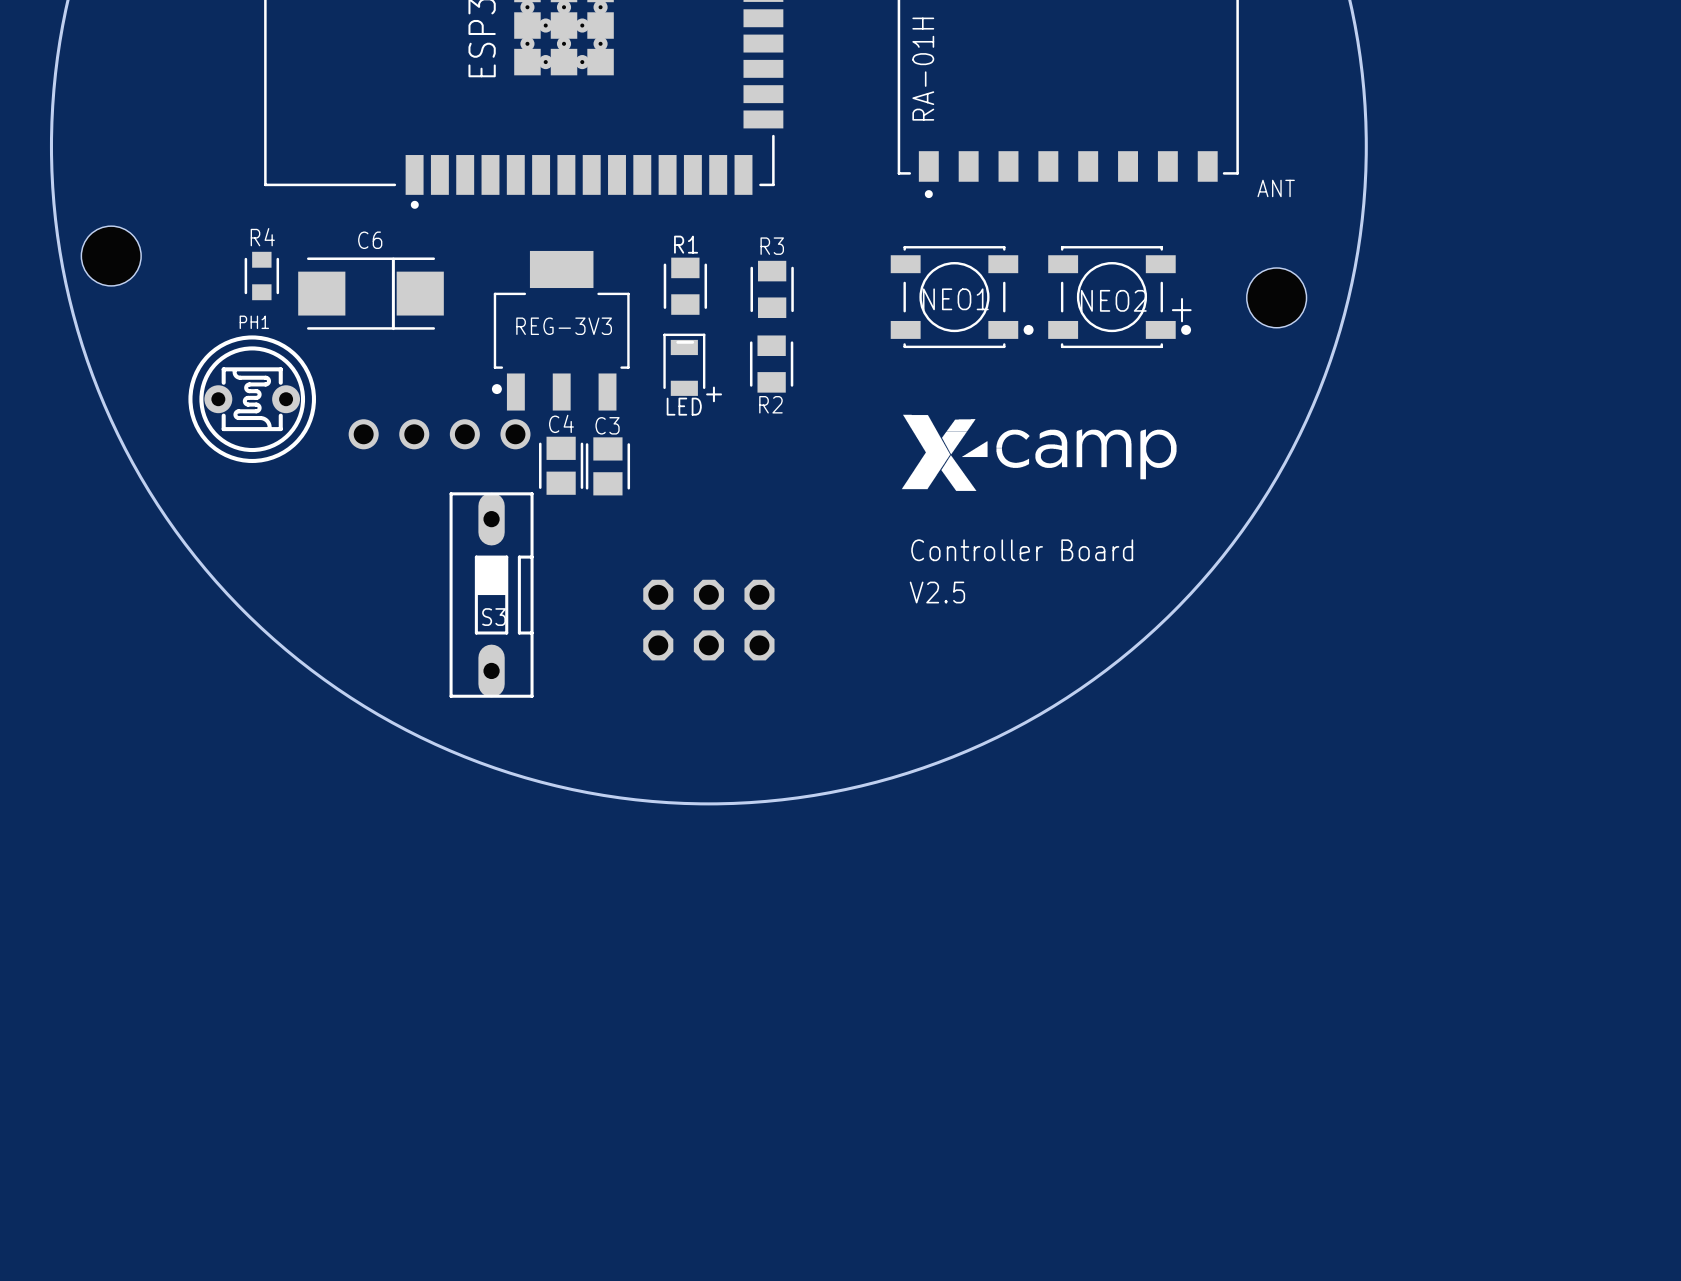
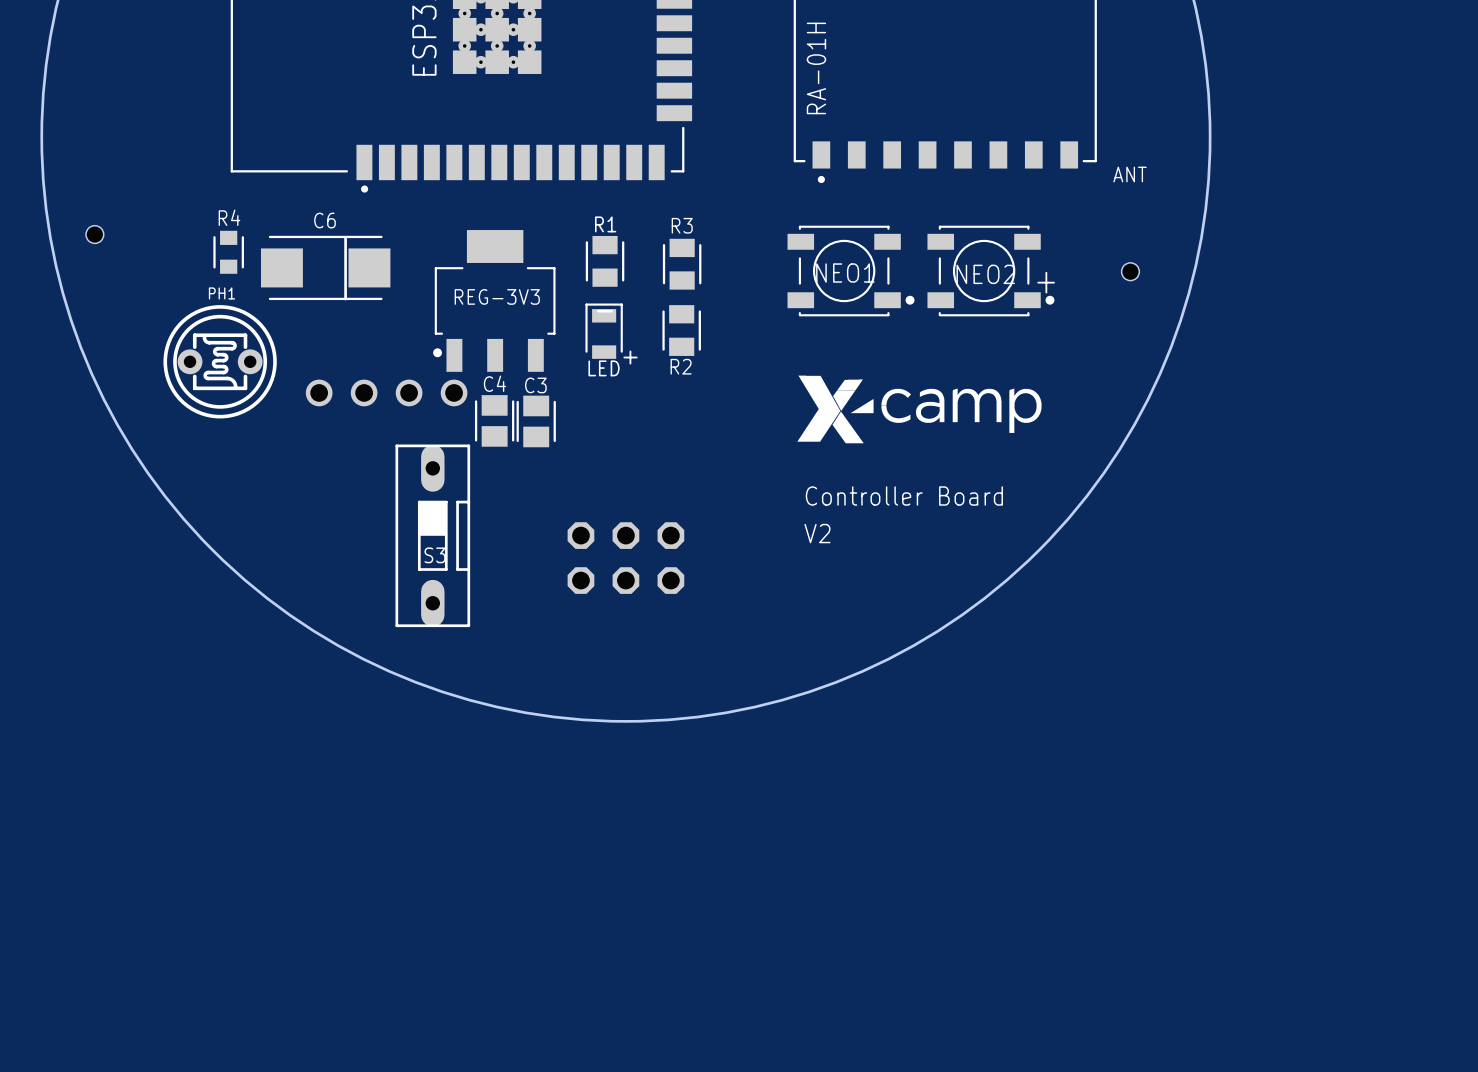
hole size: [81, 226, 142, 286] -> [86, 225, 104, 244]
hole size: [1246, 267, 1307, 328] -> [1121, 262, 1140, 281]
text: V2.5 (937, 592) -> V2 (817, 533)

